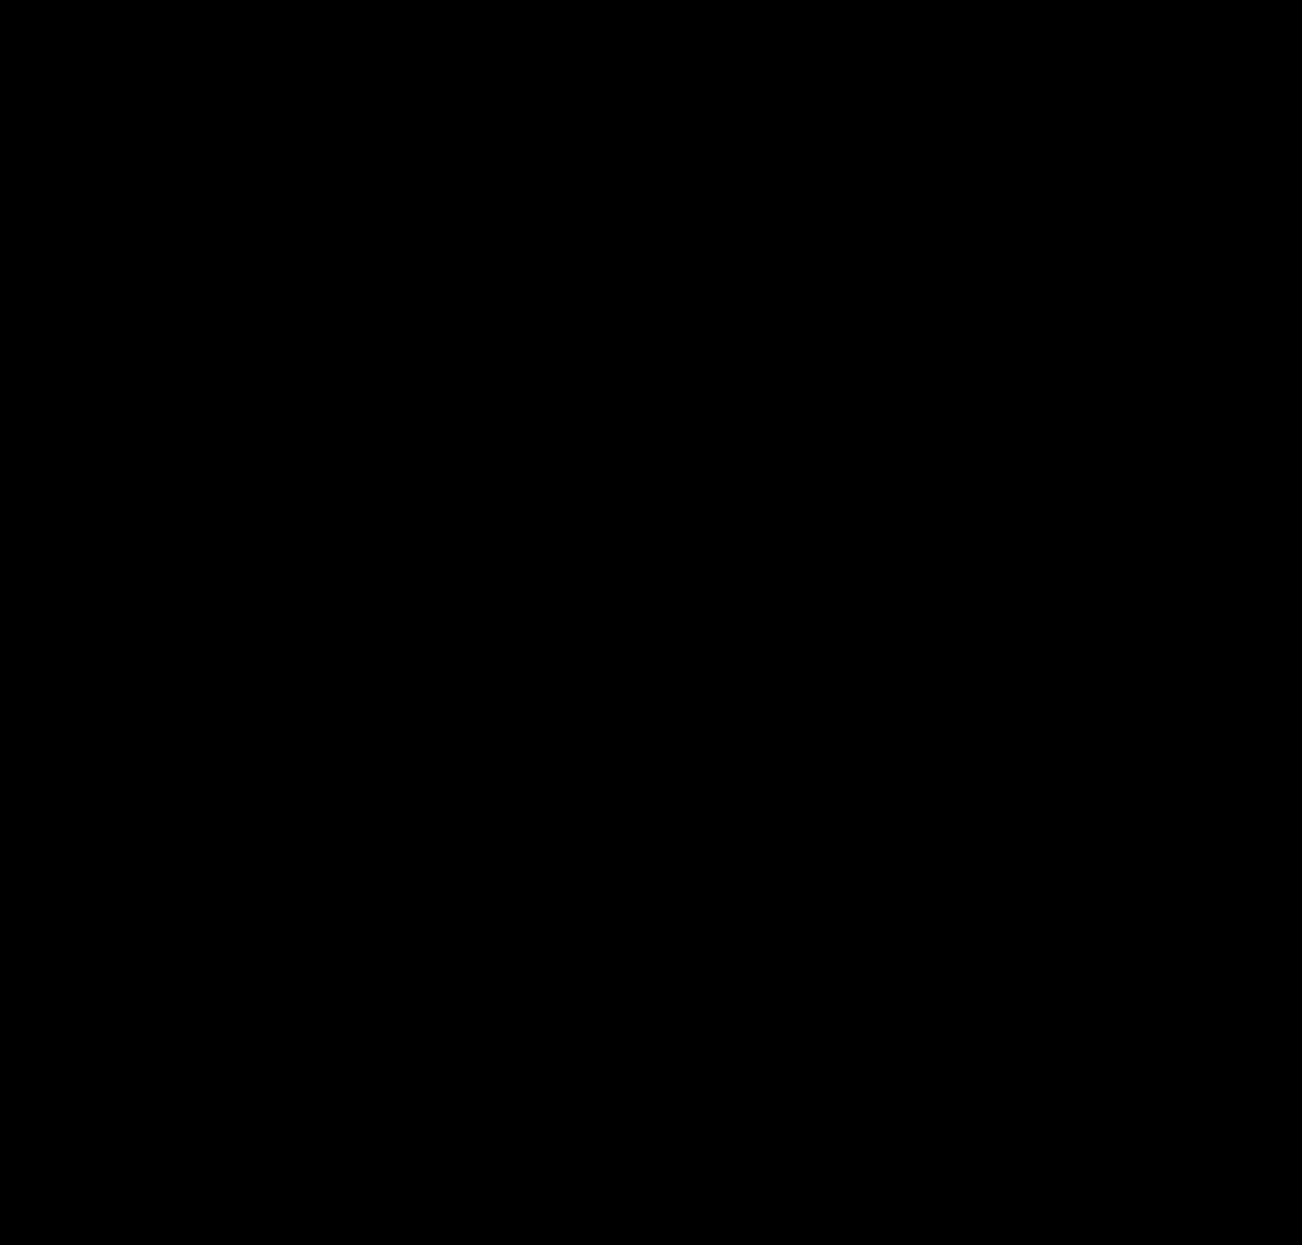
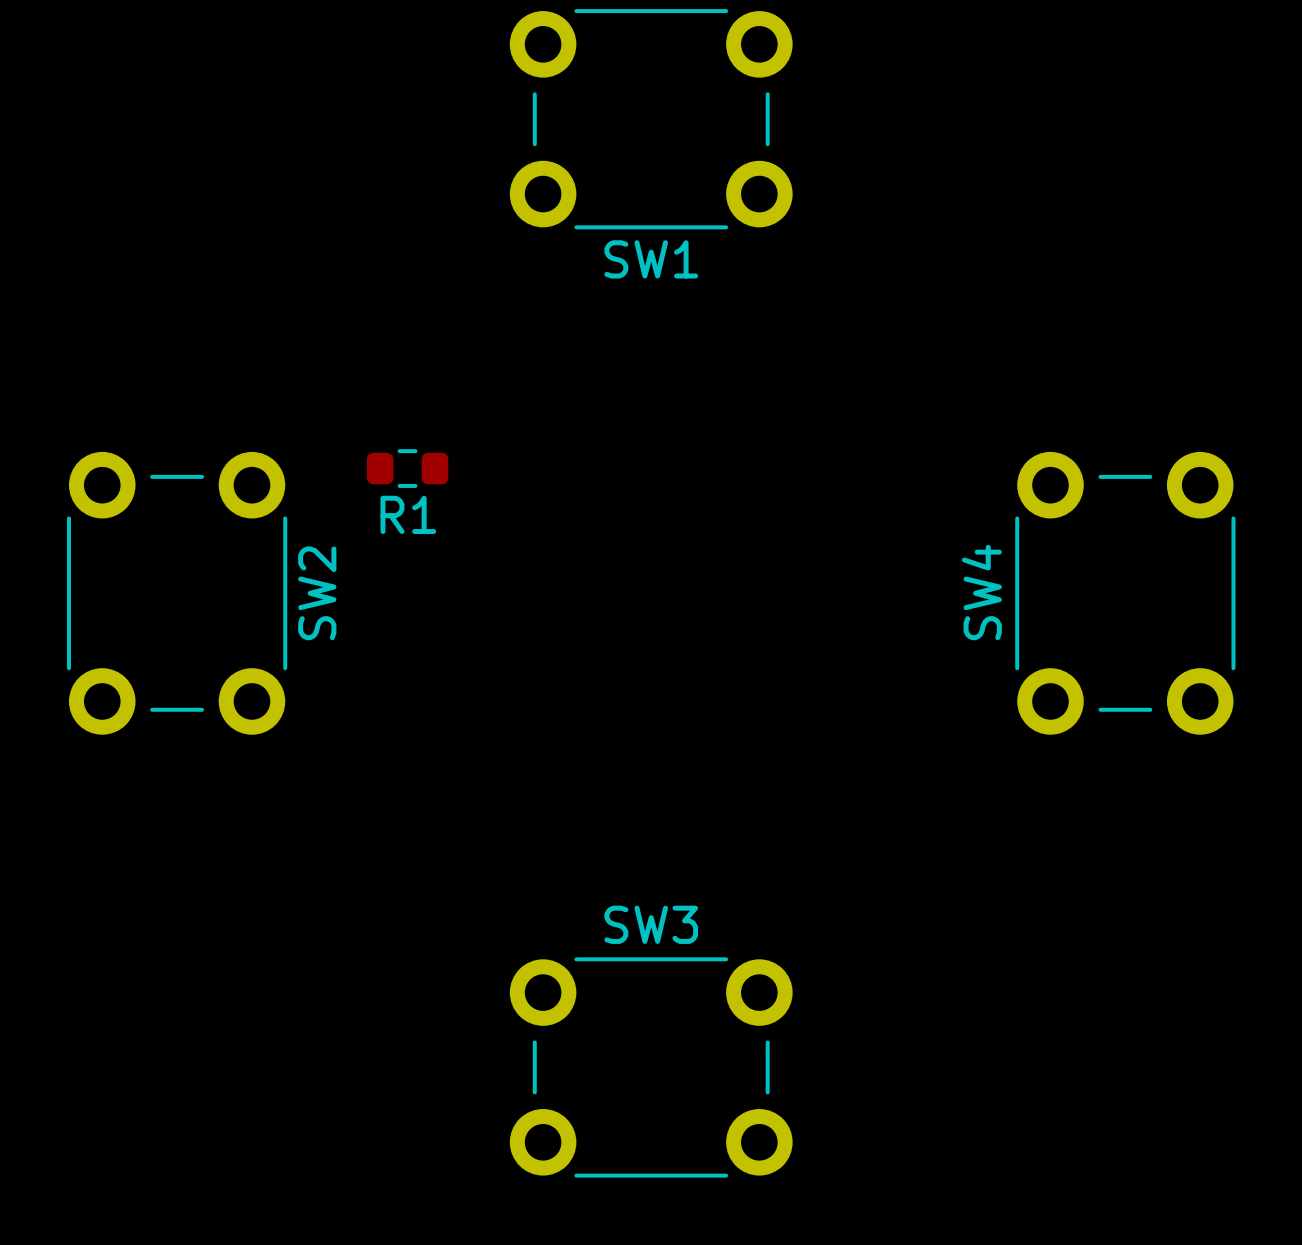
SW1: none -> (651, 119)
R1: none -> (407, 468)
SW2: none -> (177, 593)
SW4: none -> (1125, 593)
SW3: none -> (651, 1067)

